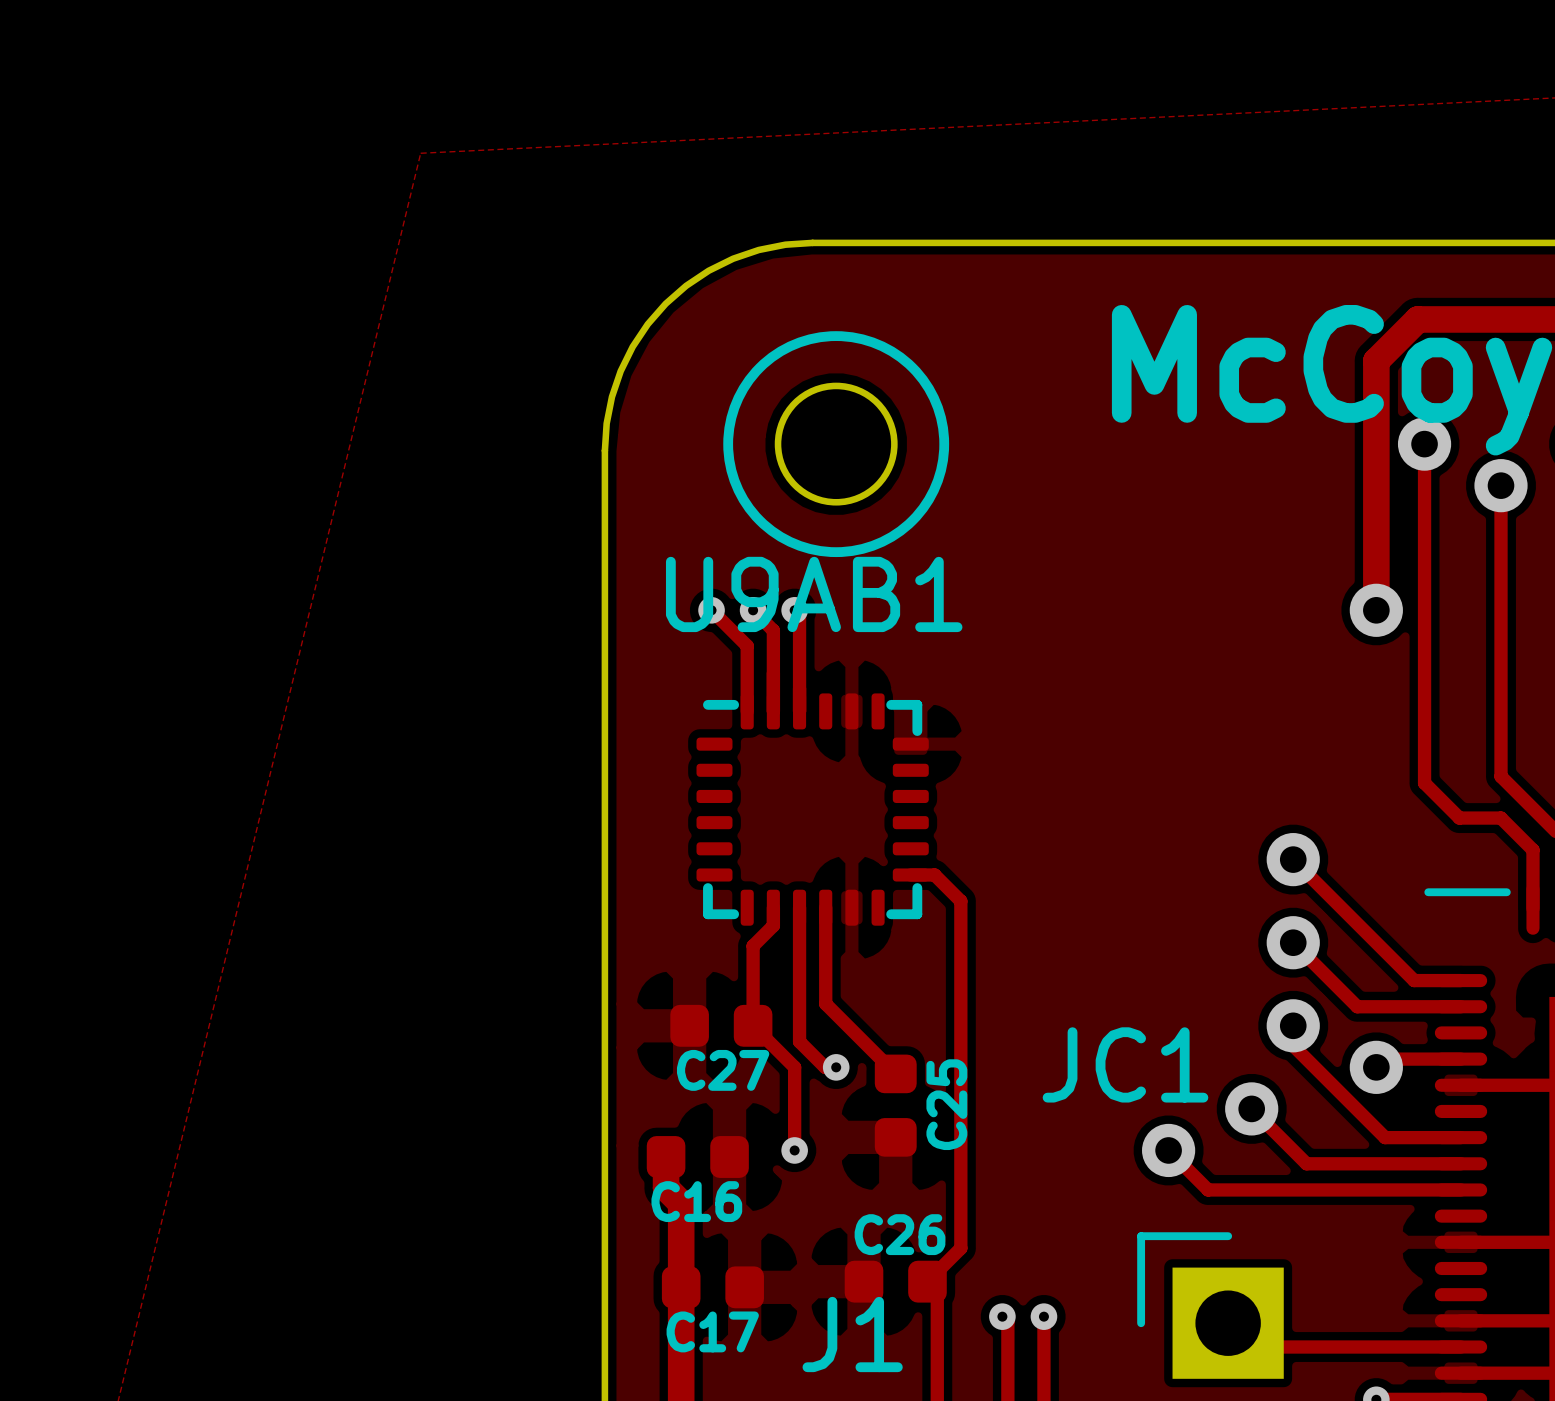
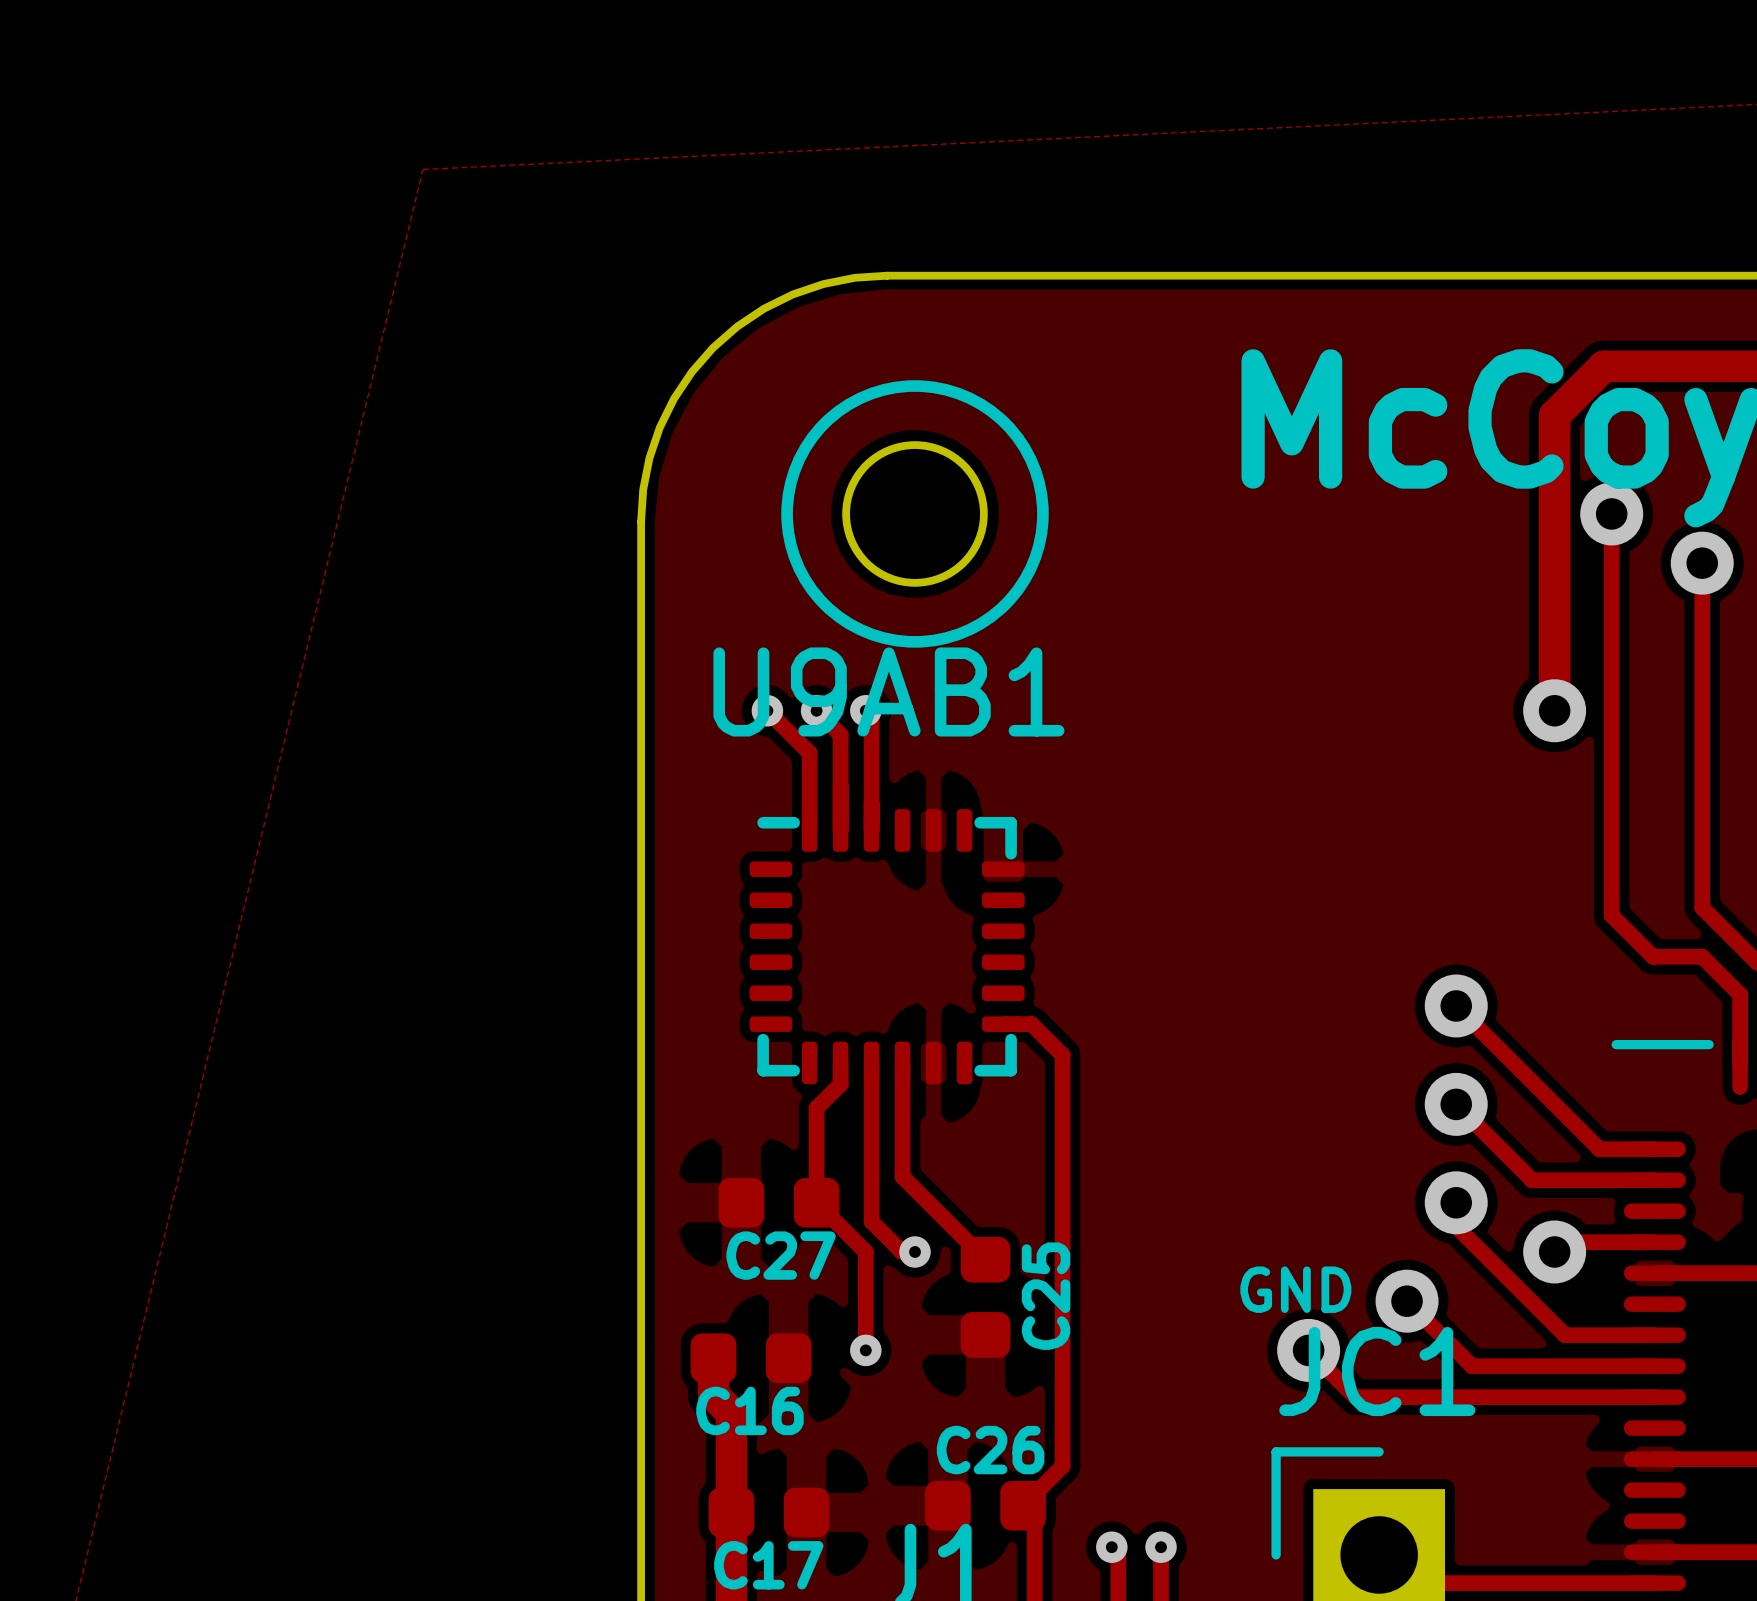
JC1 name position: JC1 (1125, 1064) -> JC1 (1377, 1371)
text: none -> GND (1295, 1289)

